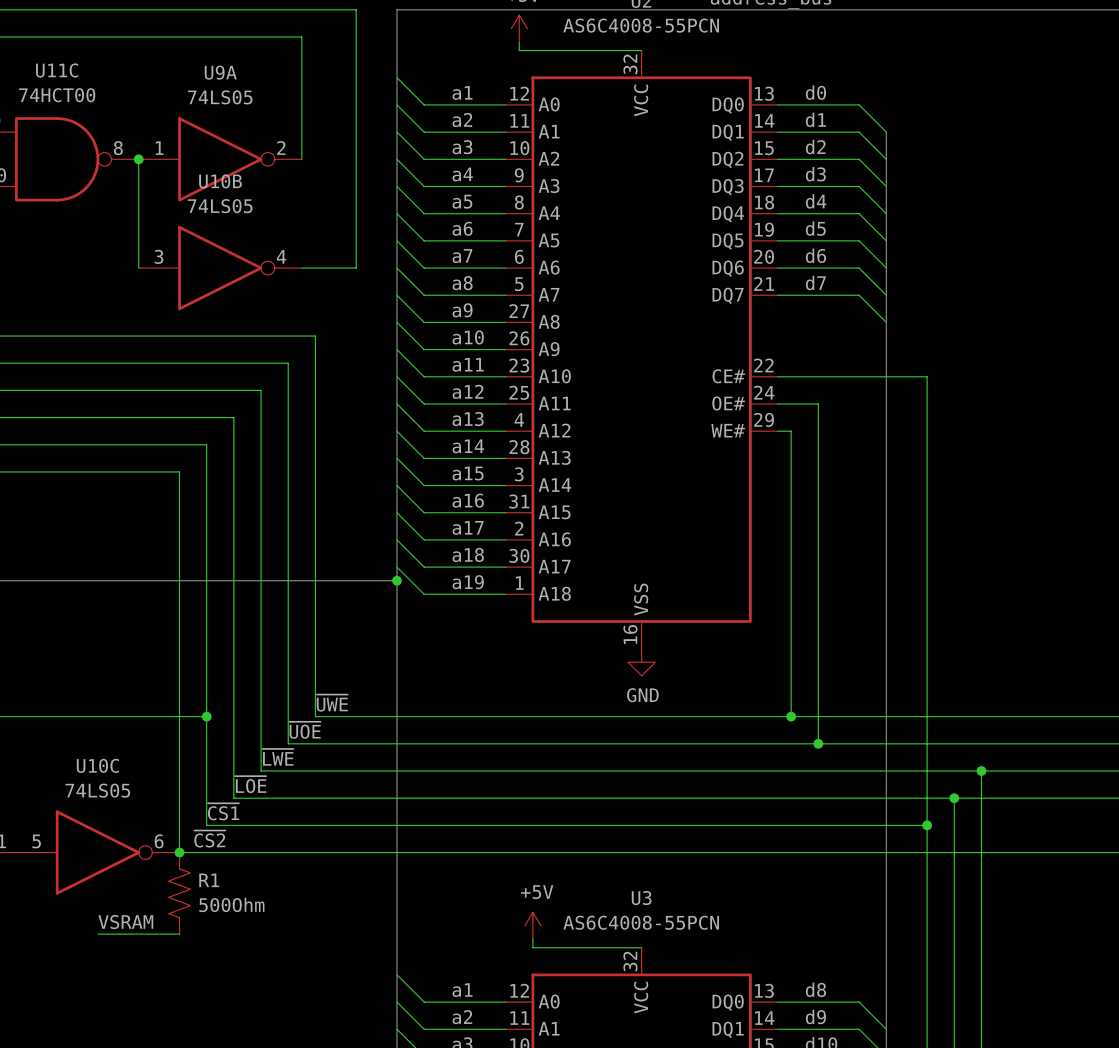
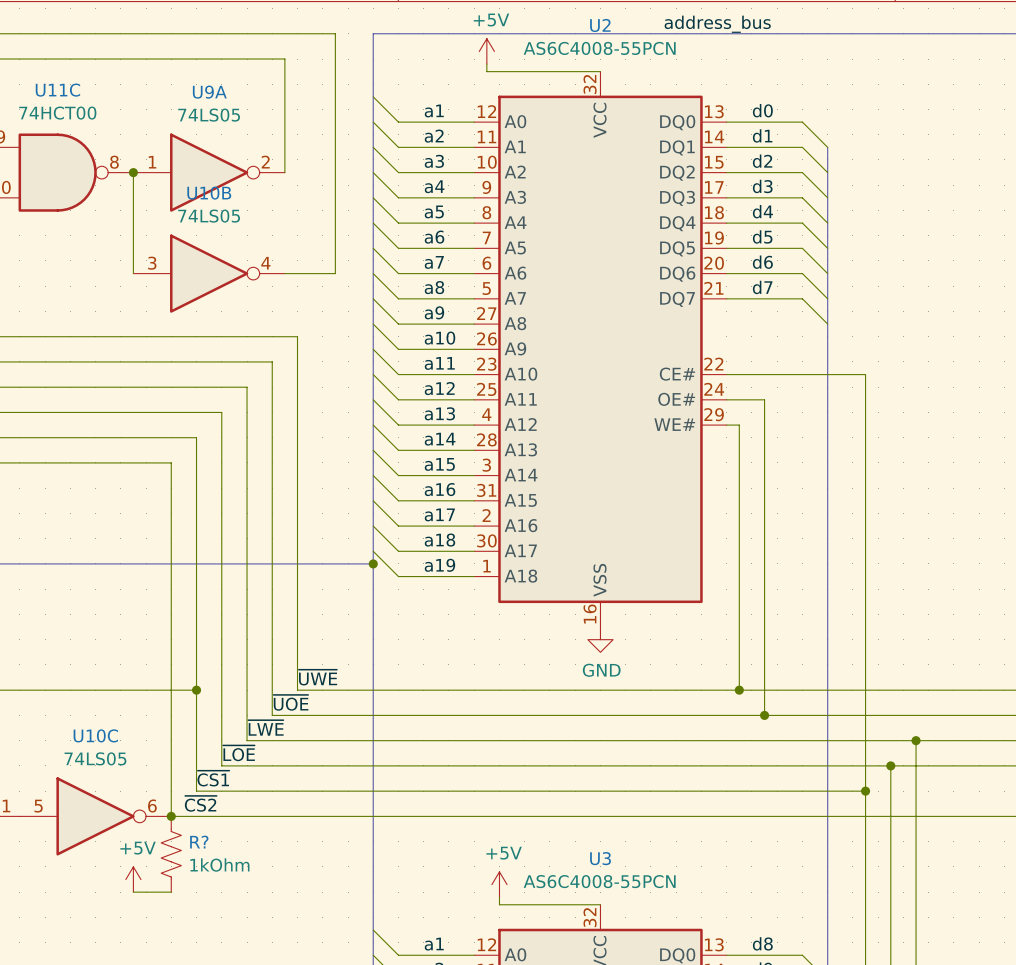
R1 name: R1 (209, 880) -> R? (199, 842)
R1 value: 500Ohm (231, 904) -> 1kOhm (219, 865)
power symbol: none -> +5V (133, 879)
label: VSRAM (125, 922) -> none
wire: (97, 934) (138, 934) -> none

